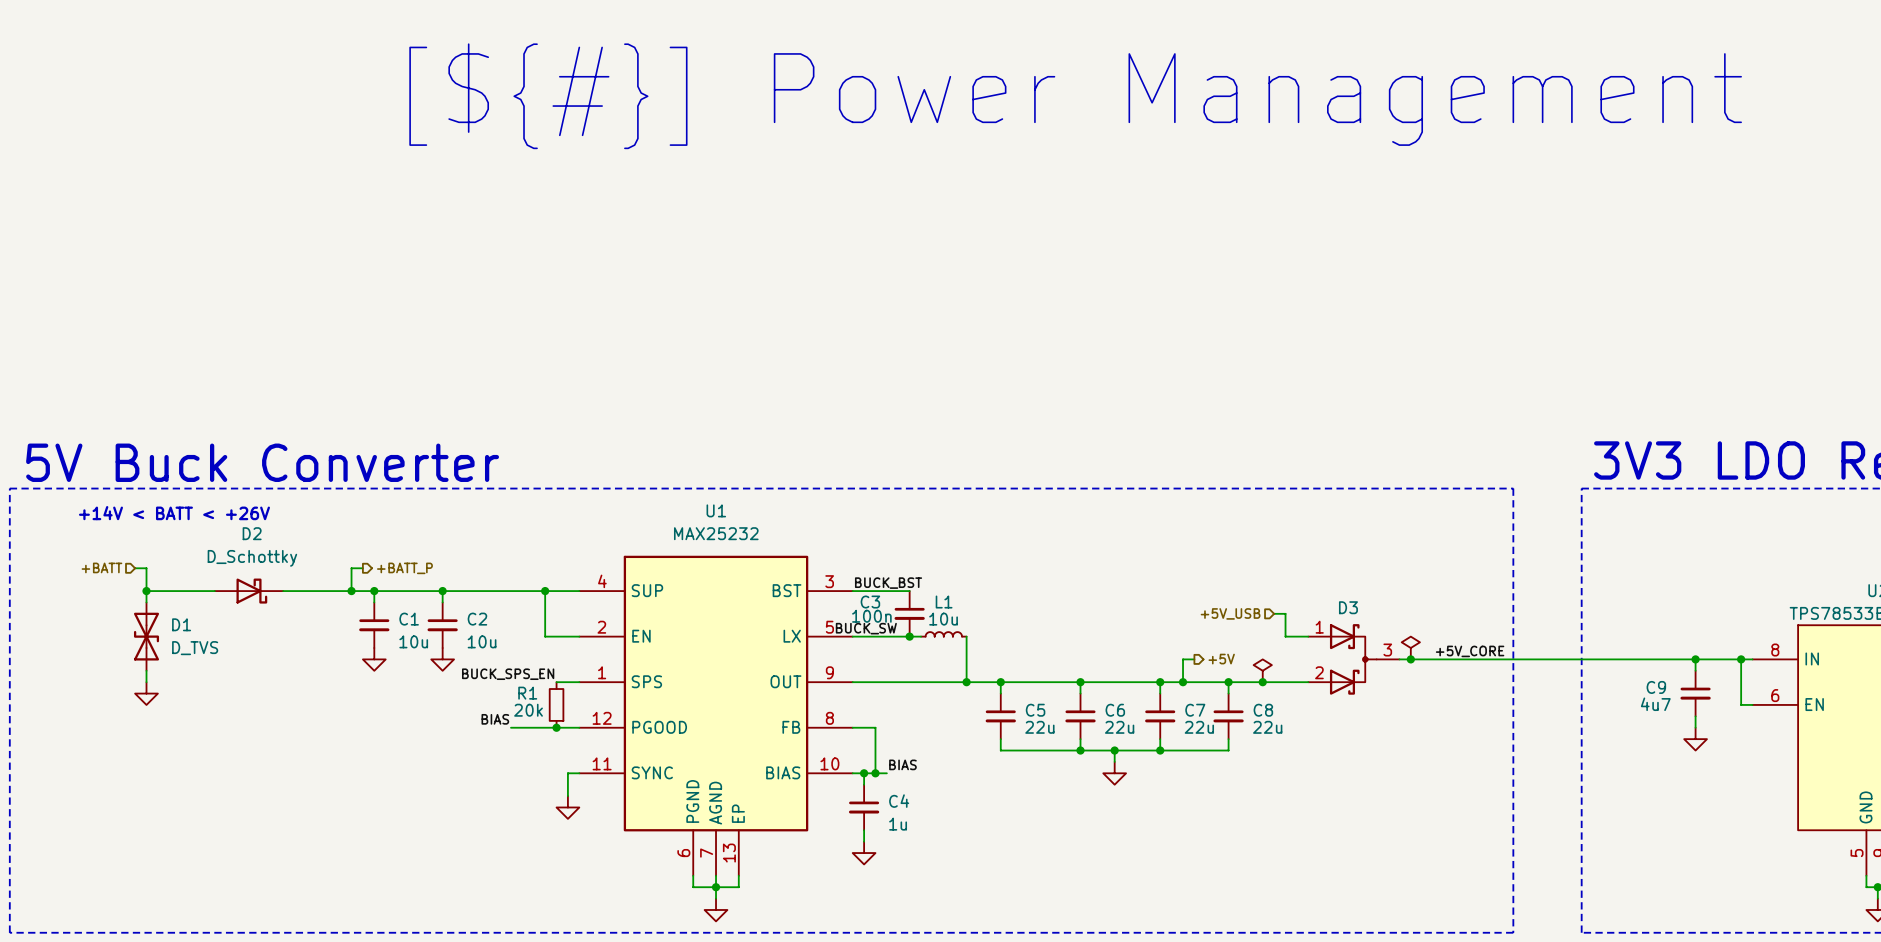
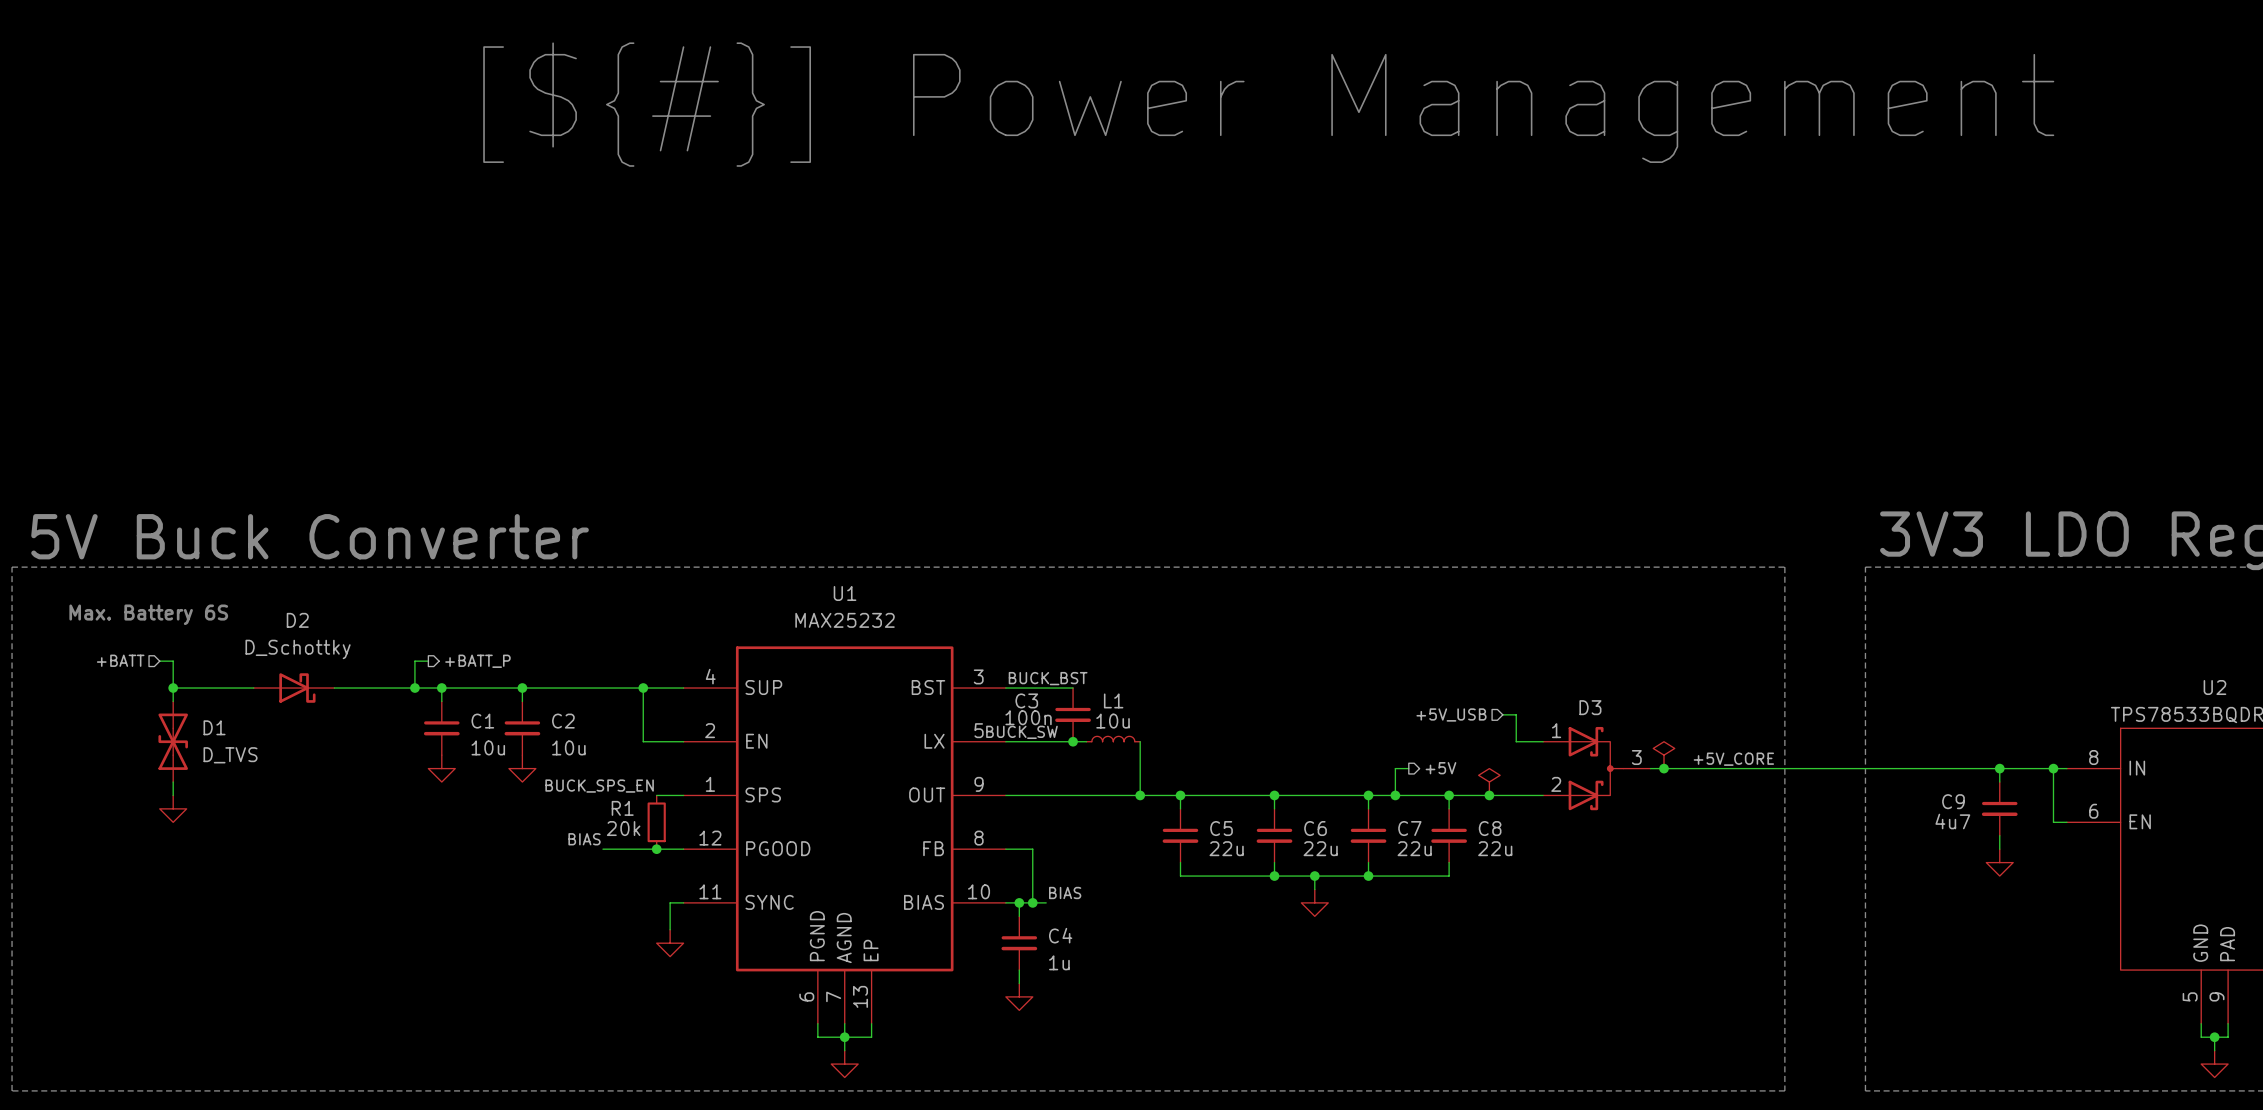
text: +14V < BATT < +26V (174, 513) -> none
text: none -> Max. Battery 6S (148, 614)

